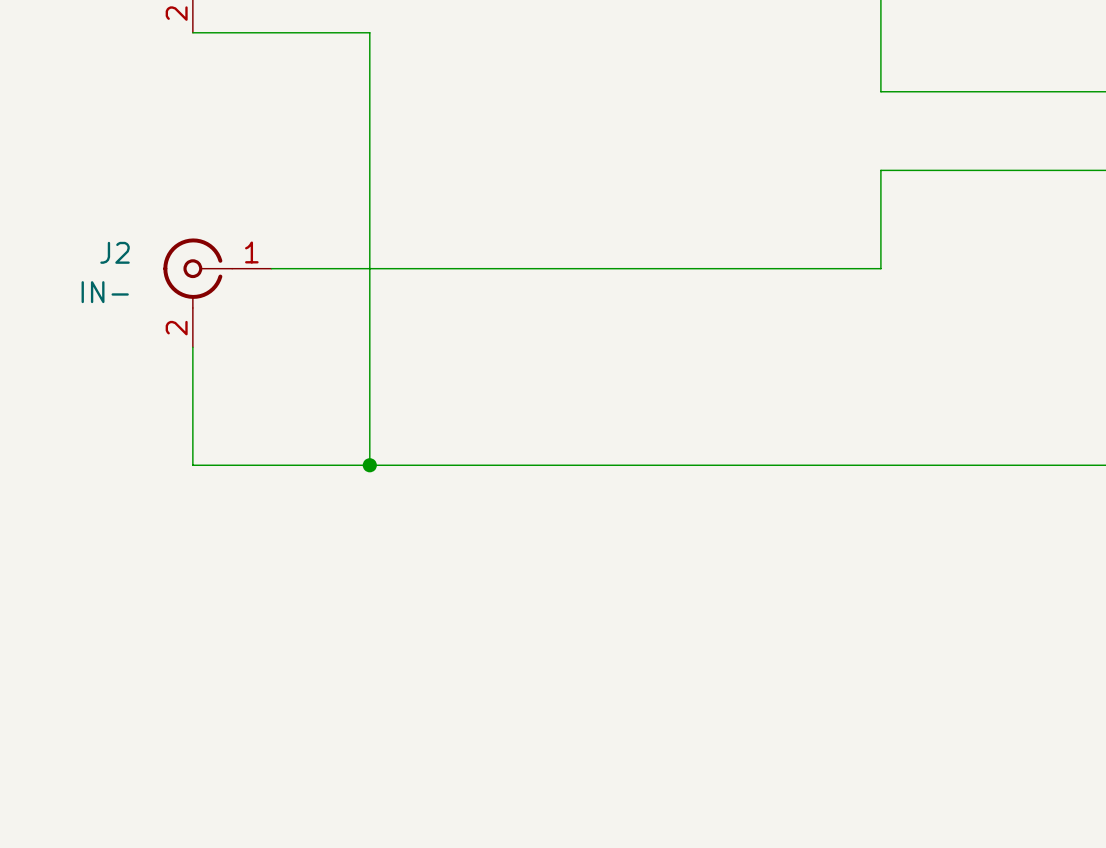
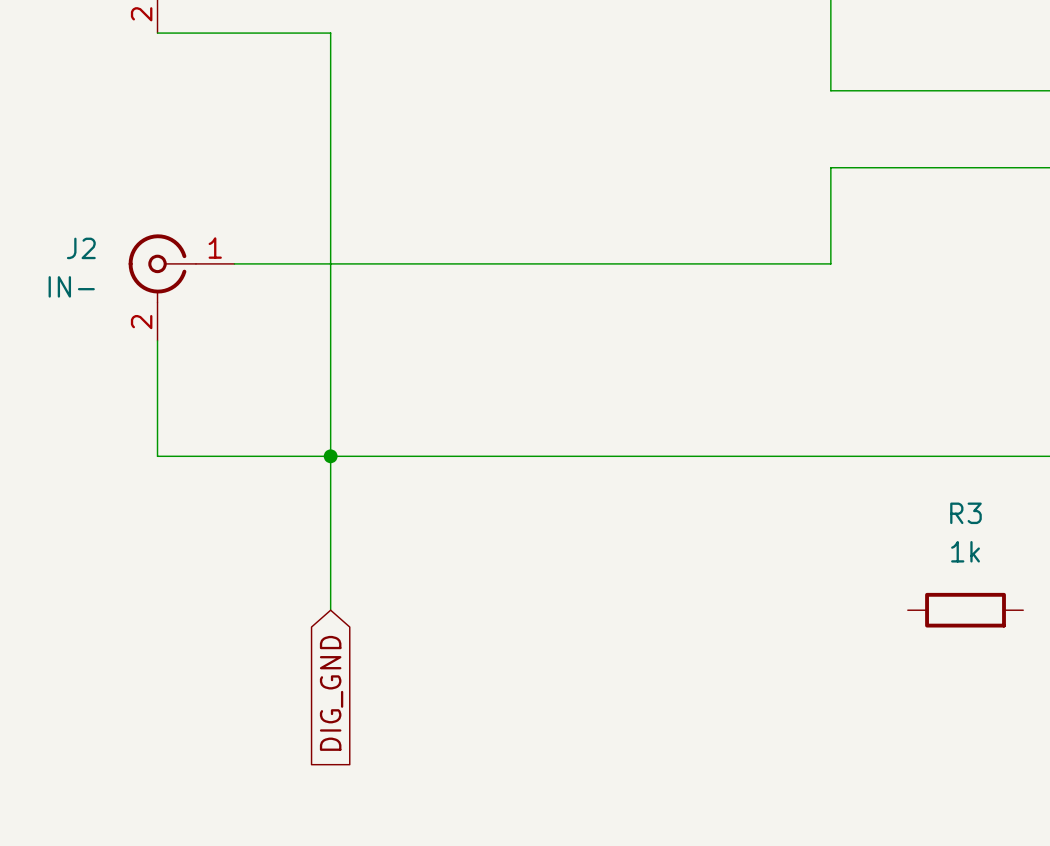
wire: none -> (330, 456) (330, 610)
R3: none -> 1k (965, 610)
global label: none -> DIG_GND (331, 693)

